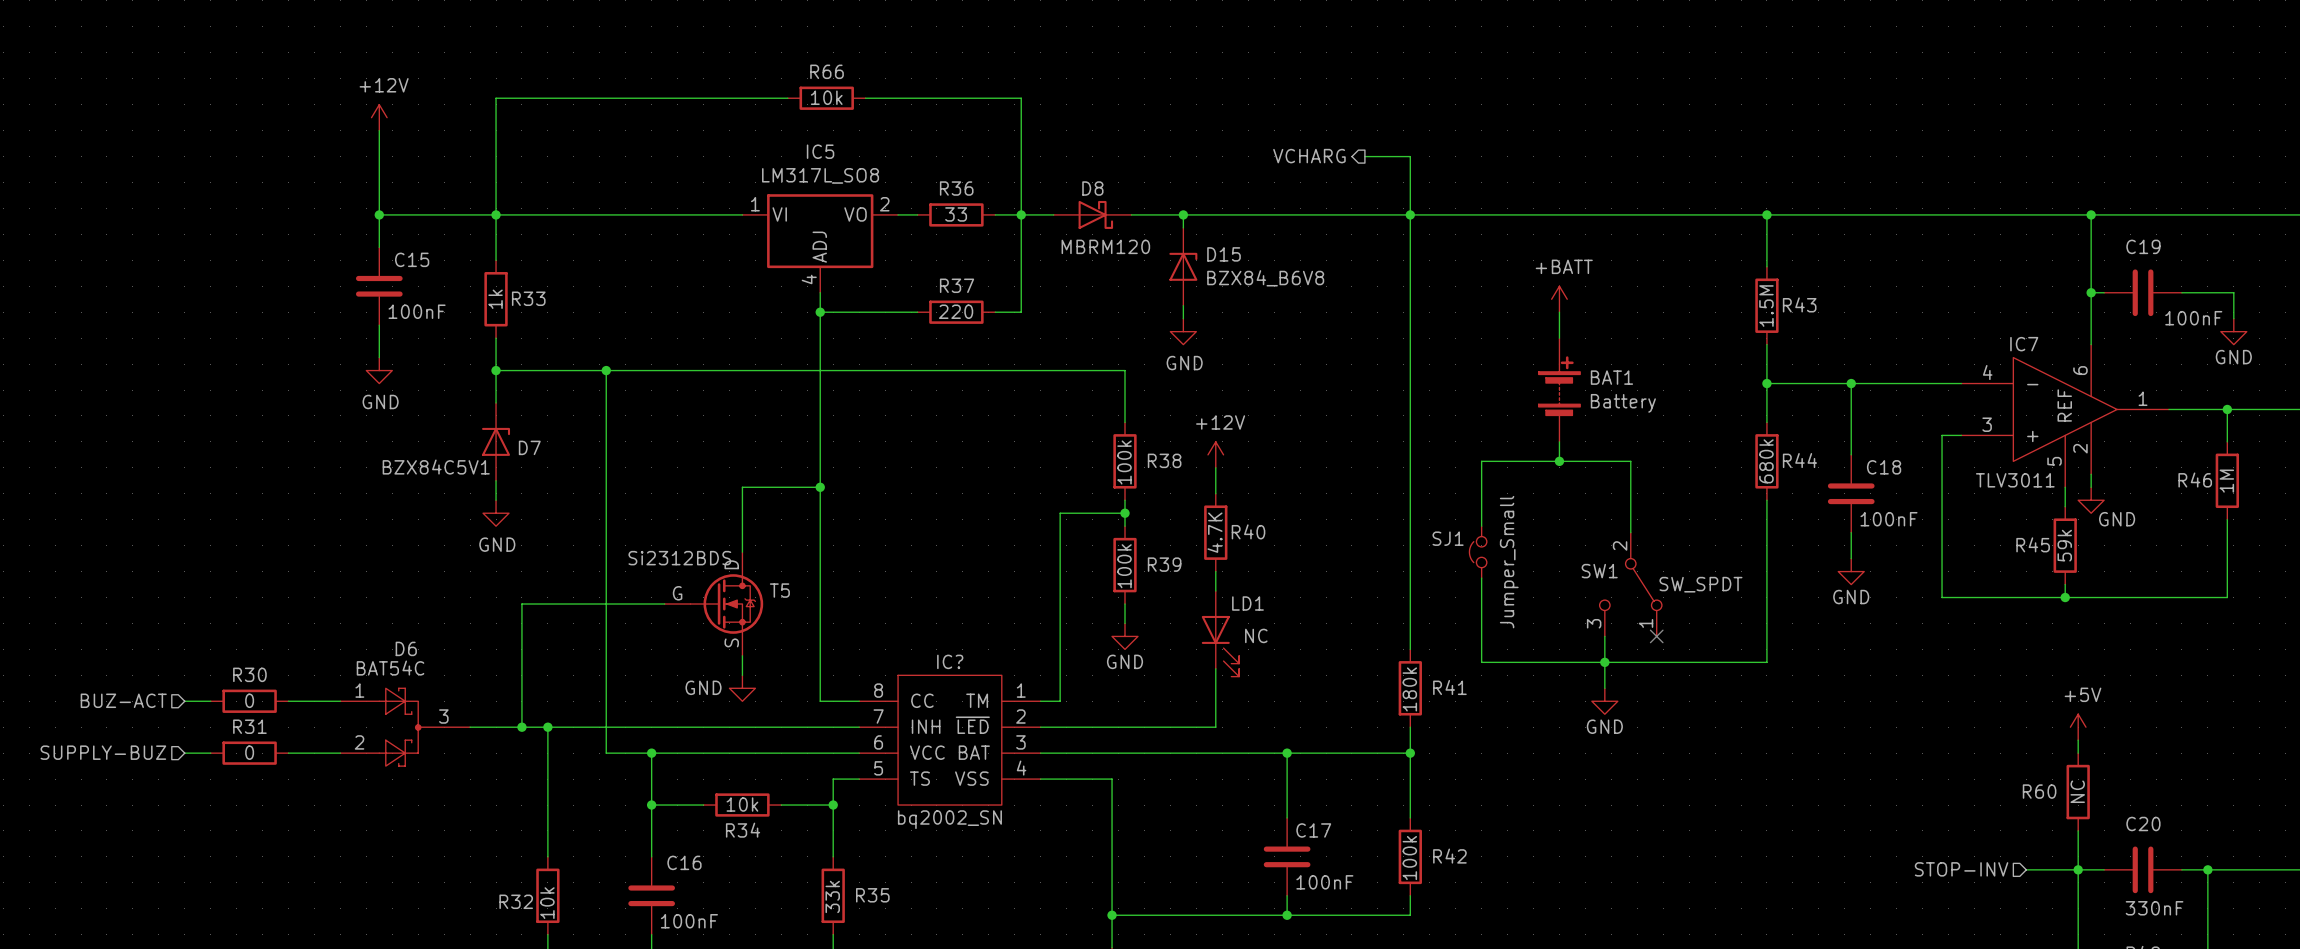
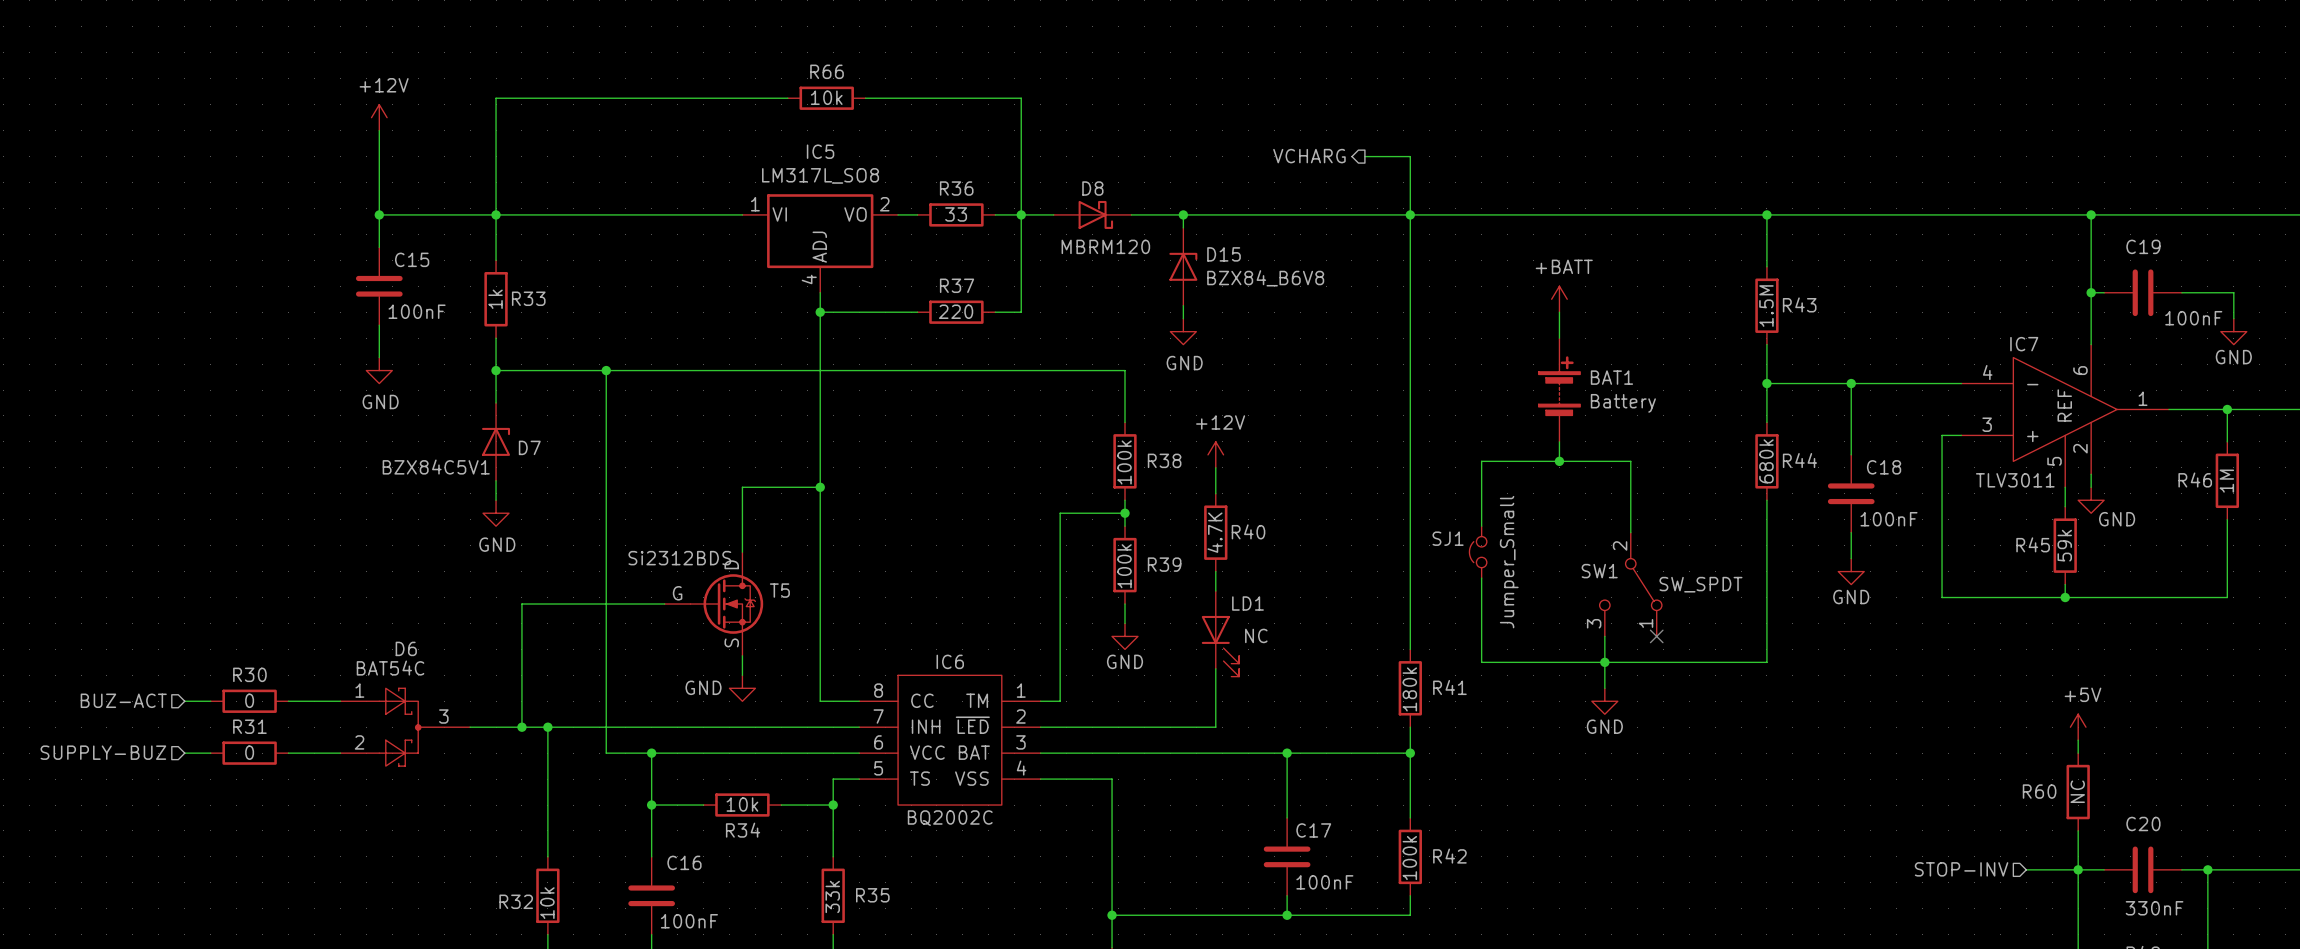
IC? name: IC? (950, 661) -> IC6 (950, 661)
IC? value: bq2002_SN (949, 819) -> BQ2002C (950, 818)

